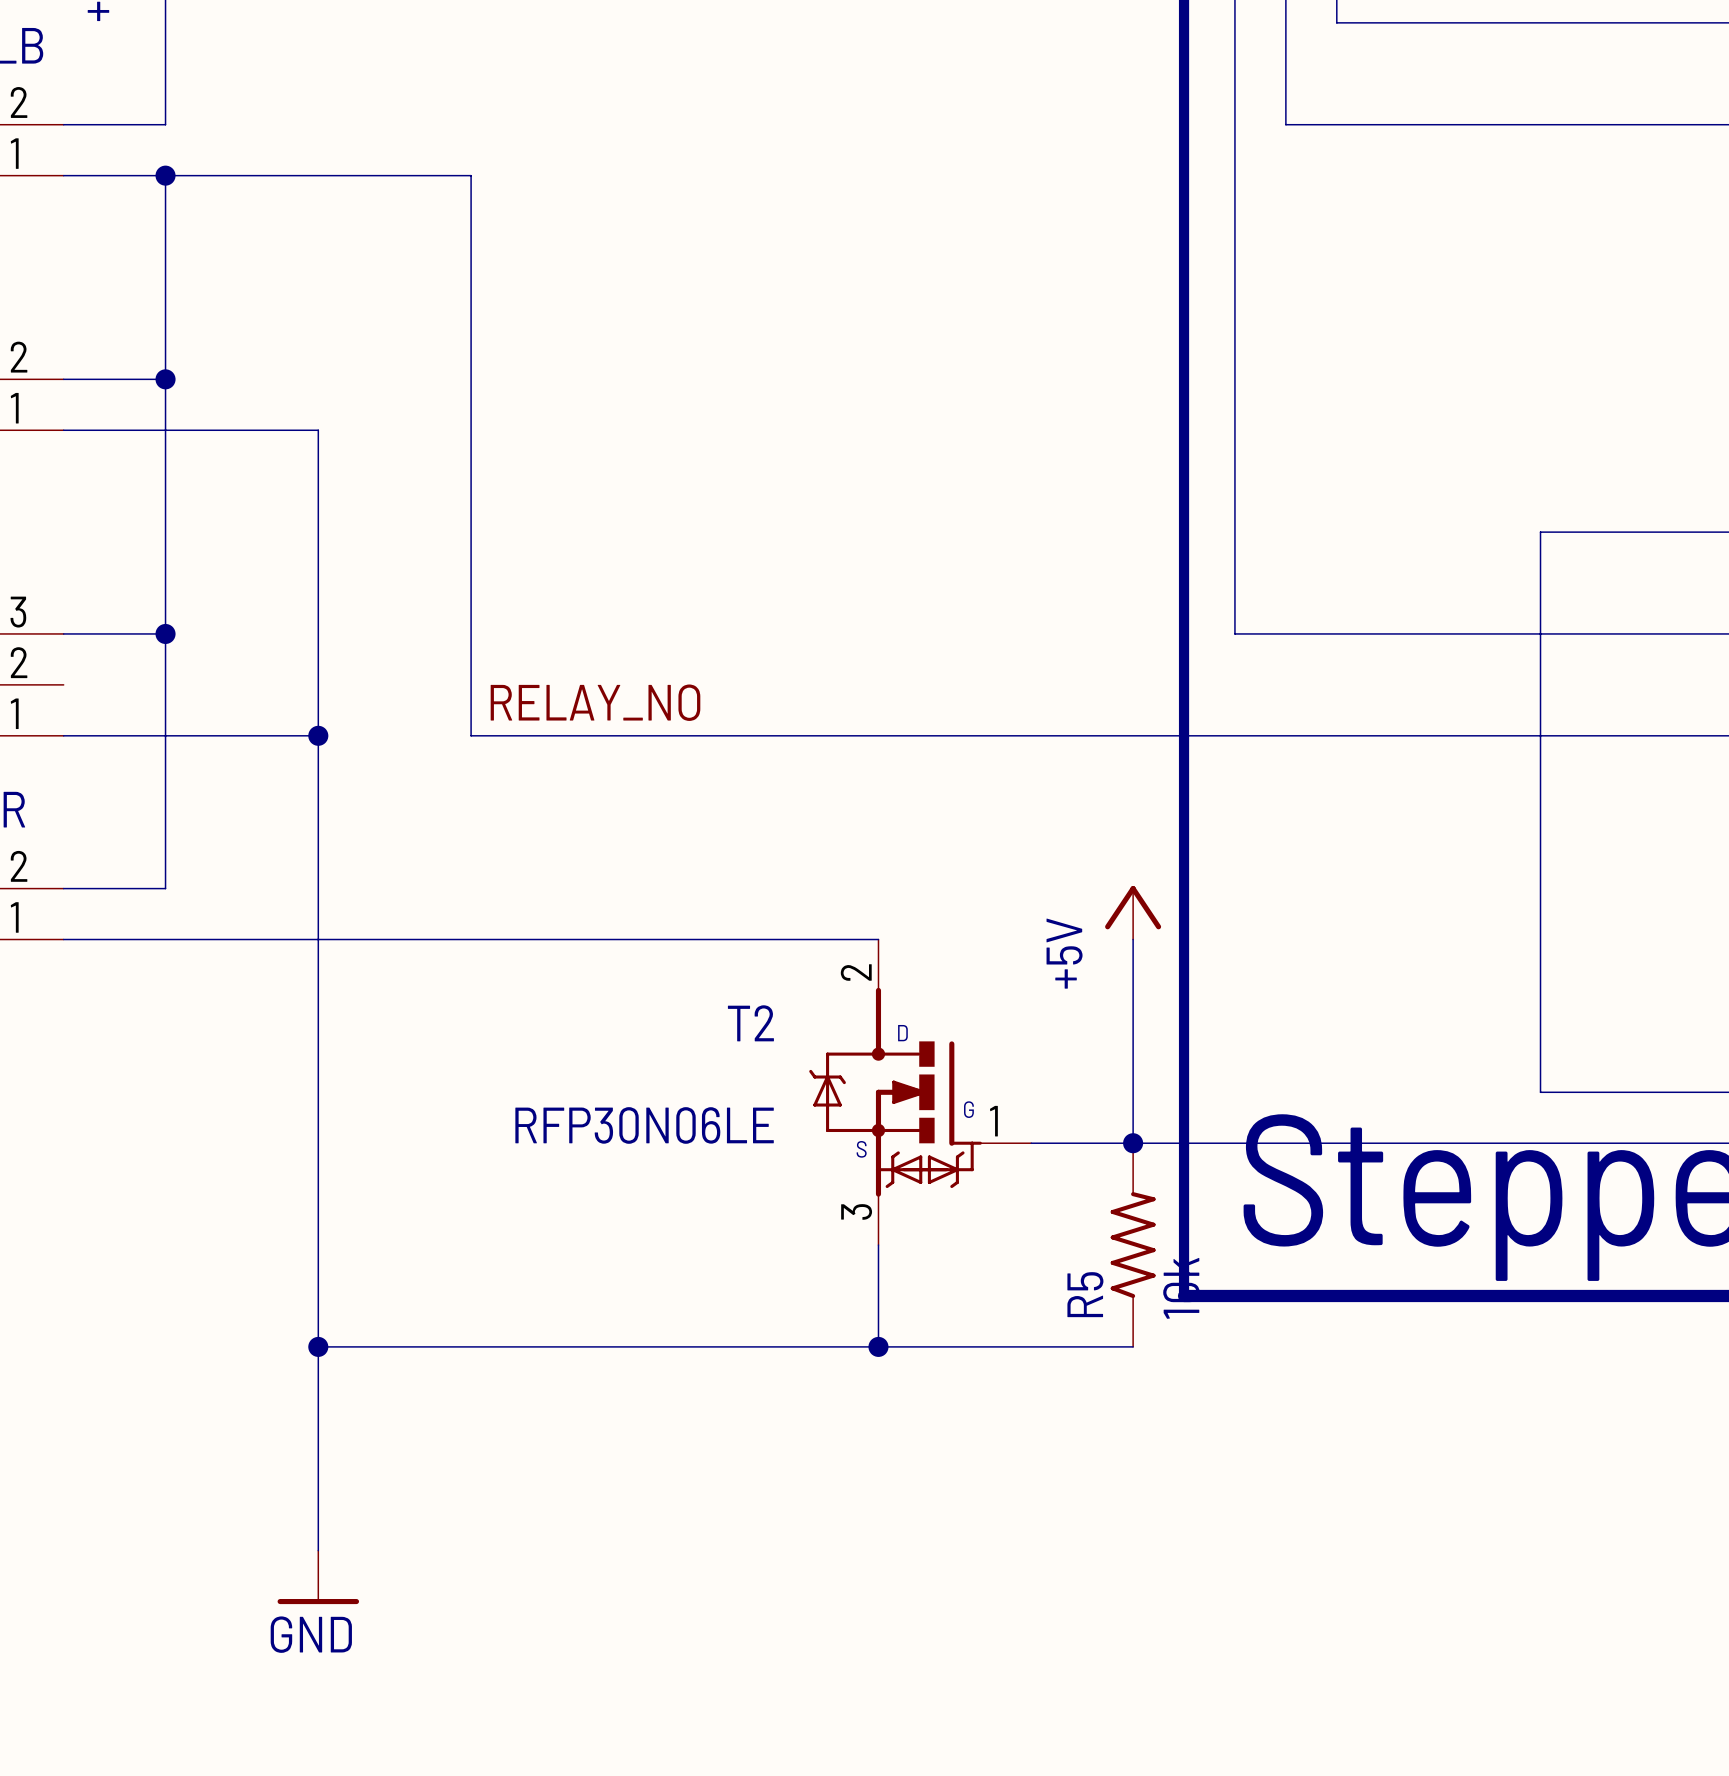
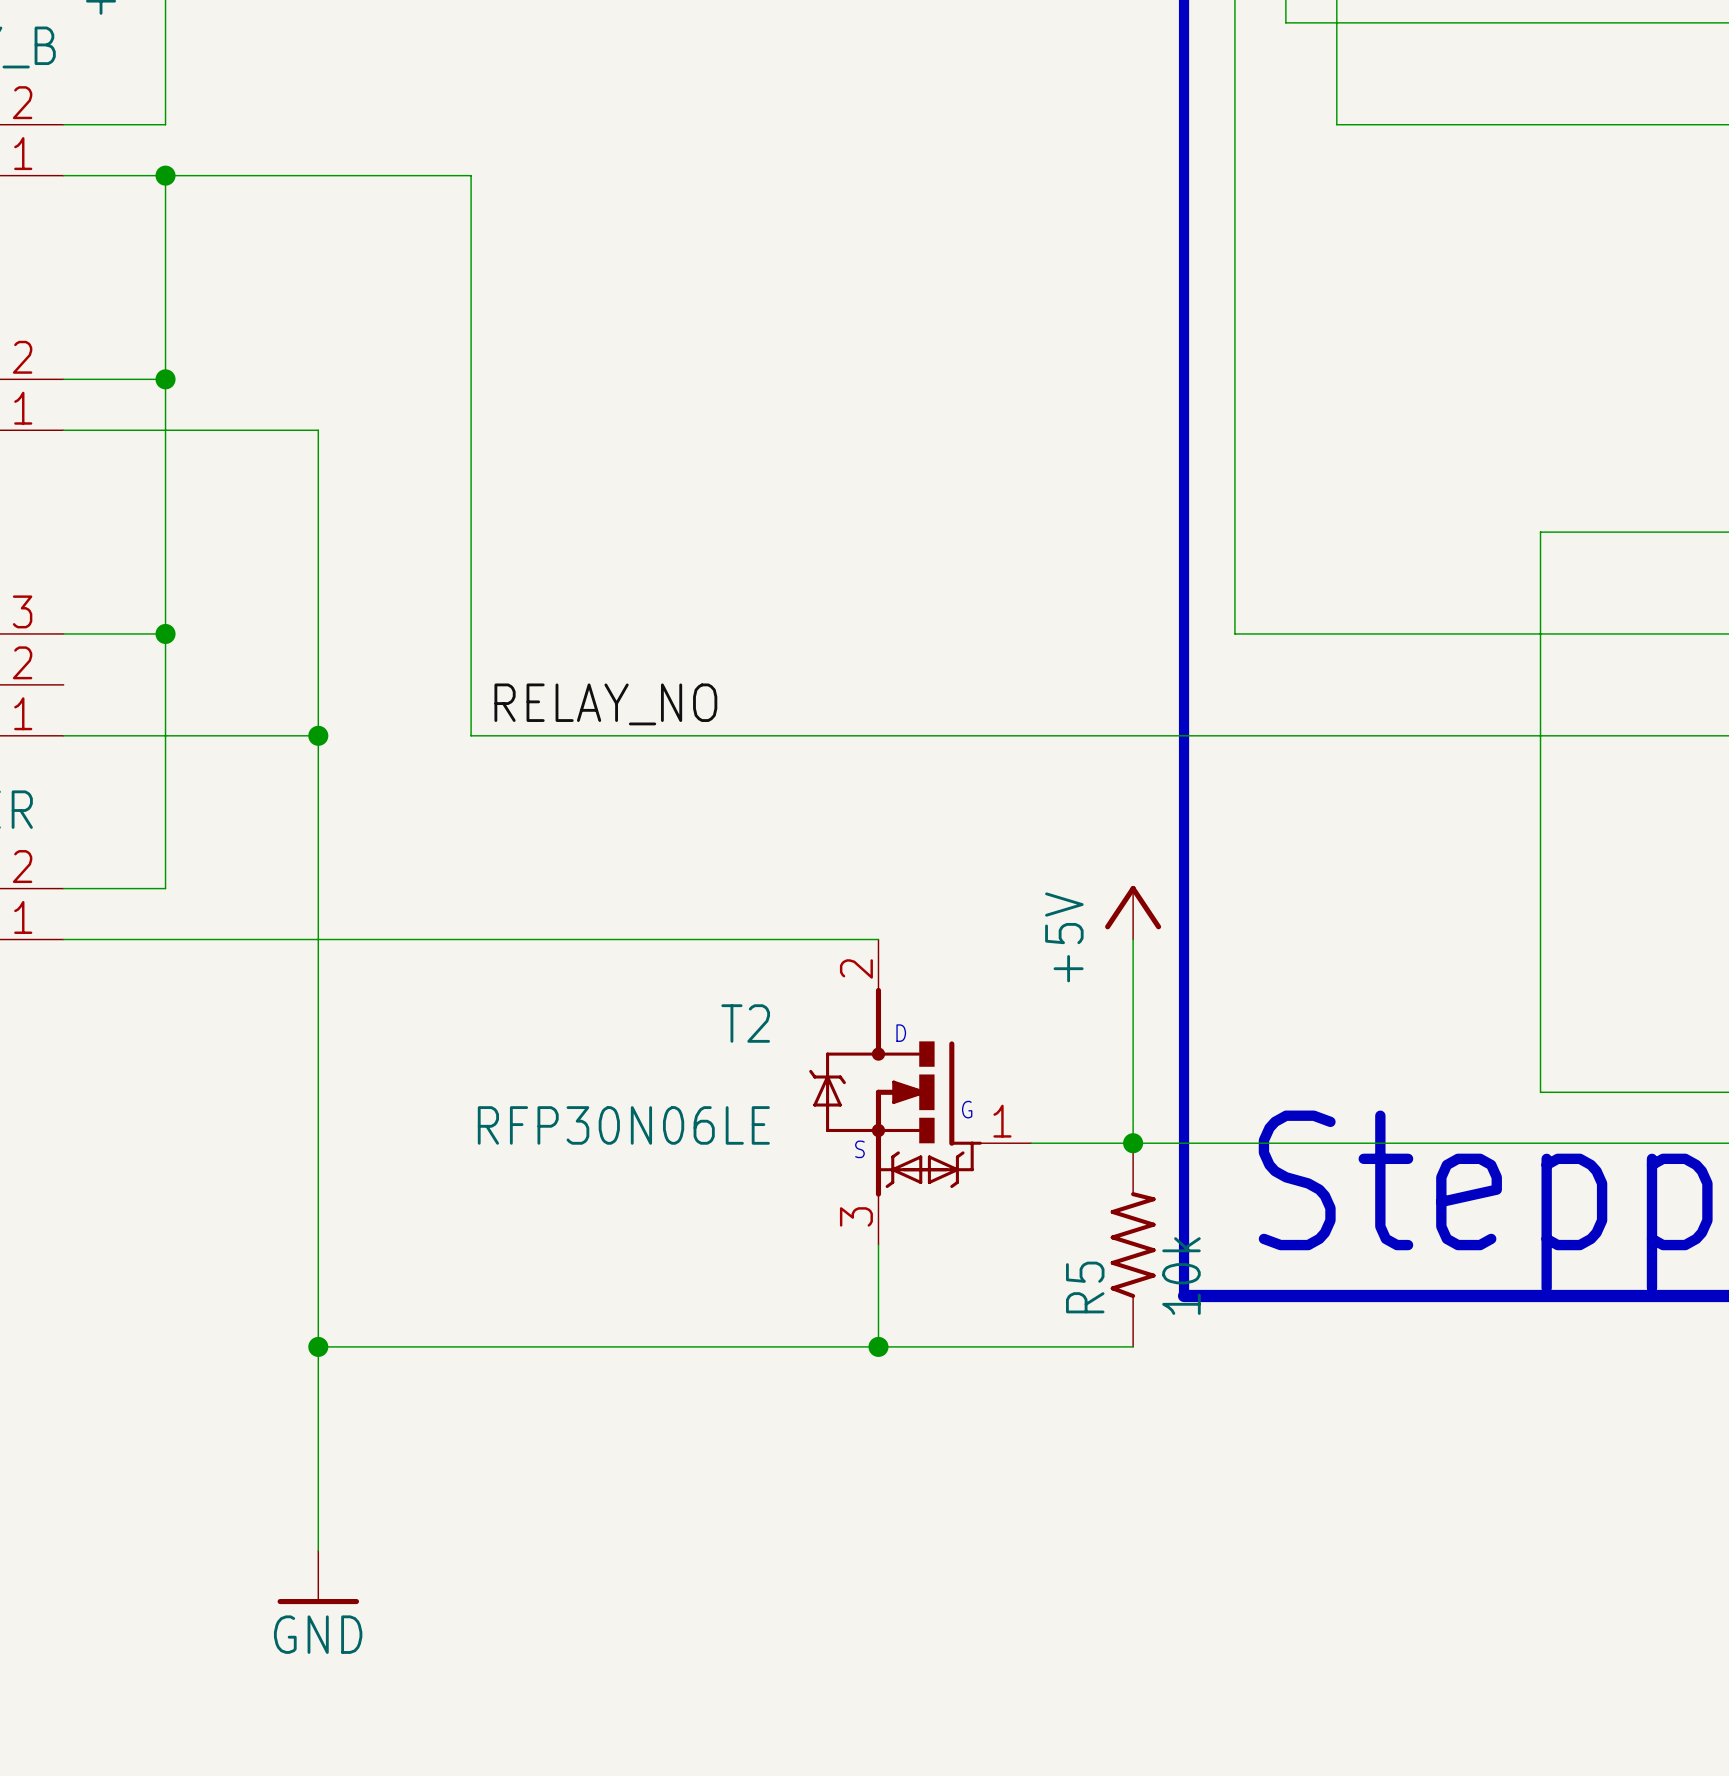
wire: (1285, 22) (1285, 124) (1336, 124) -> (1285, 22) (1336, 22) (1336, 124)

